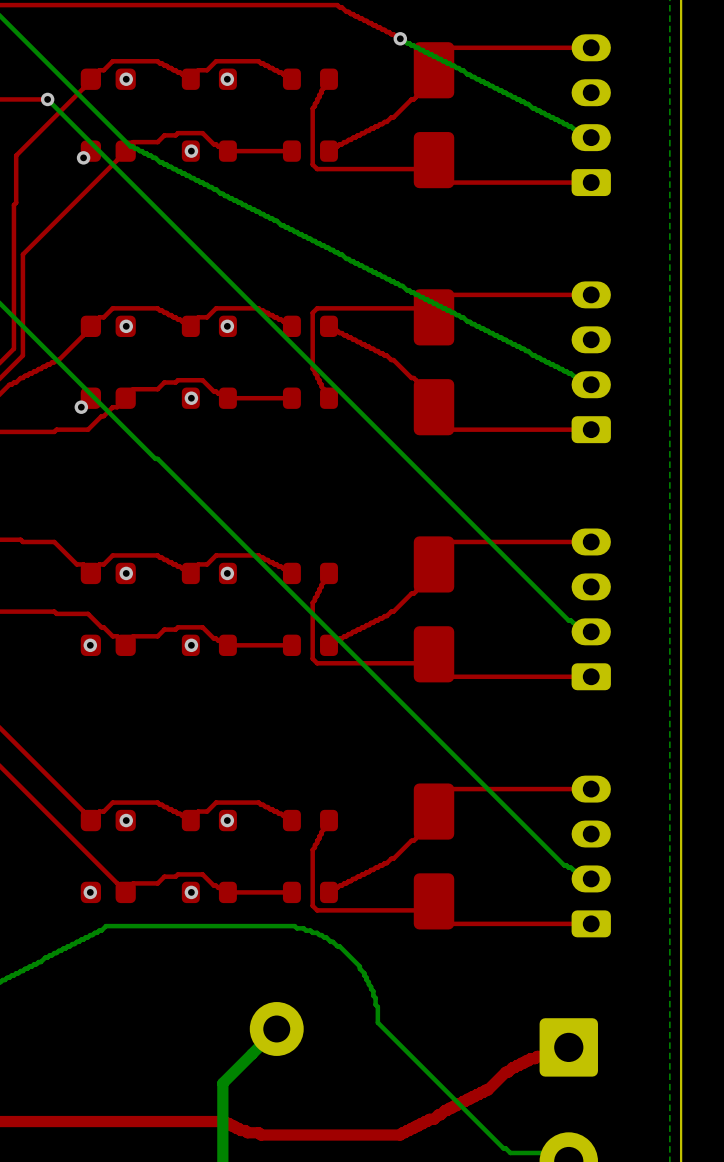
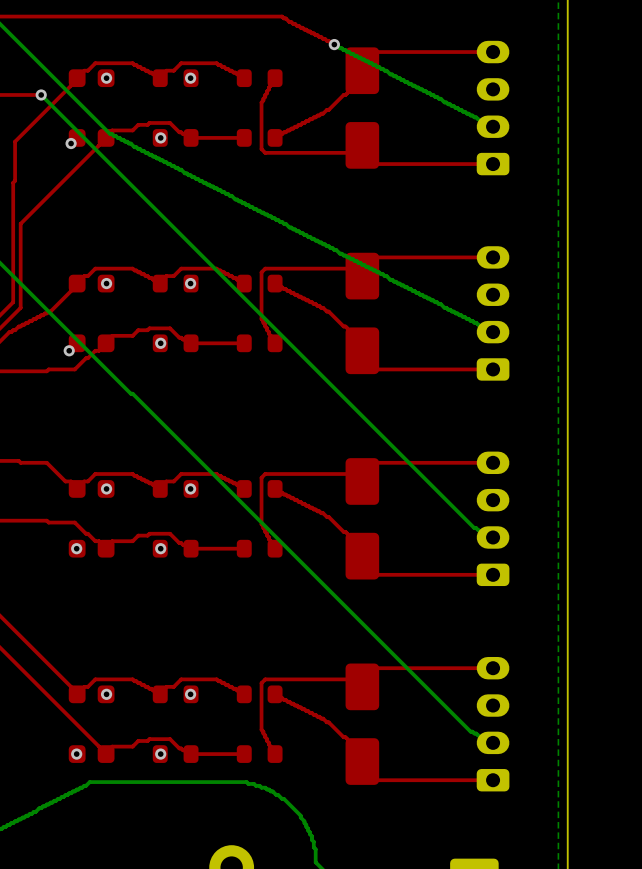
top track: (434, 564) (416, 591) (393, 611) (328, 645) -> (362, 481) (347, 474) (265, 474) (261, 477) (261, 513)
top track: (328, 573) (312, 602) -> none
top track: (312, 616) (312, 658) (317, 663) (416, 663) (434, 654) -> (275, 488) (328, 516) (347, 533) (362, 556)
top track: none -> (261, 524) (275, 548)
top track: (434, 811) (416, 838) (393, 858) (328, 892) -> (362, 686) (347, 679) (265, 679) (261, 683) (261, 718)
top track: (328, 820) (312, 849) -> none
top track: (312, 863) (312, 905) (317, 910) (416, 910) (434, 901) -> (275, 694) (328, 722) (347, 739) (362, 761)
top track: none -> (261, 729) (275, 754)

